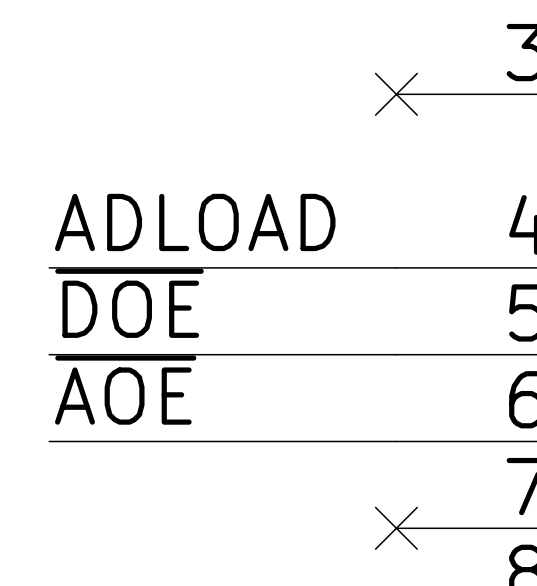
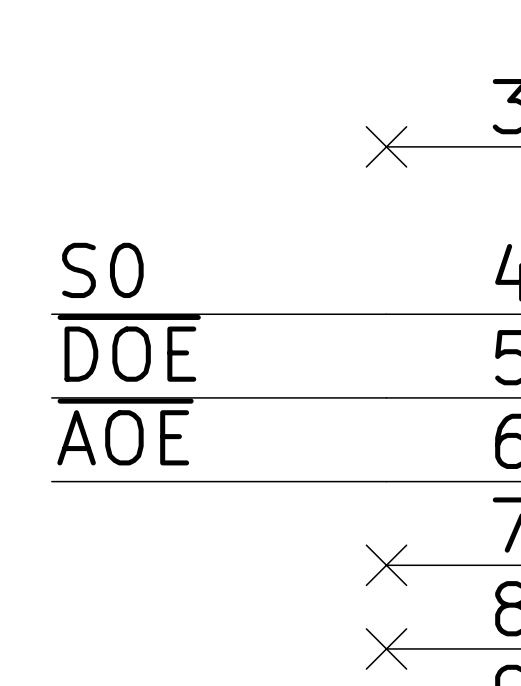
label: ADLOAD (195, 222) -> S0 (102, 270)

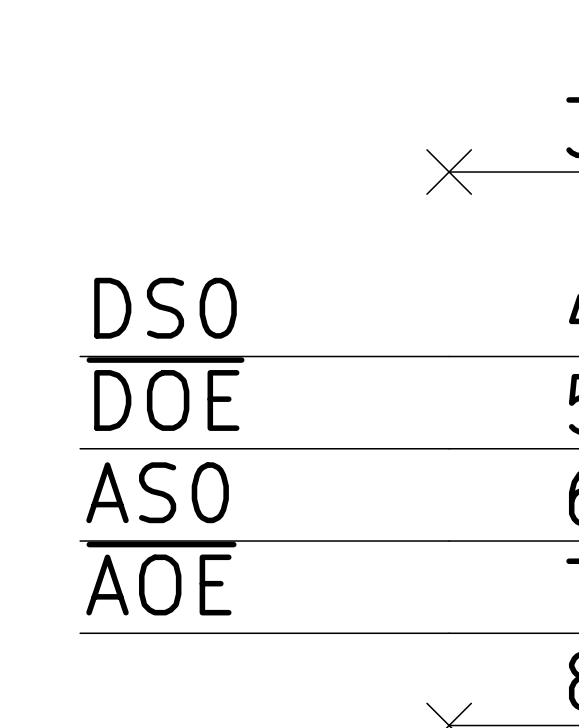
label: S0 (102, 270) -> DS0 (165, 308)
label: ~{AOE} (125, 432) -> AS0 (157, 492)
label: none -> ~{AOE} (161, 578)
wire: none -> (80, 633) (449, 633)
no-connect mark: (386, 565) -> none

